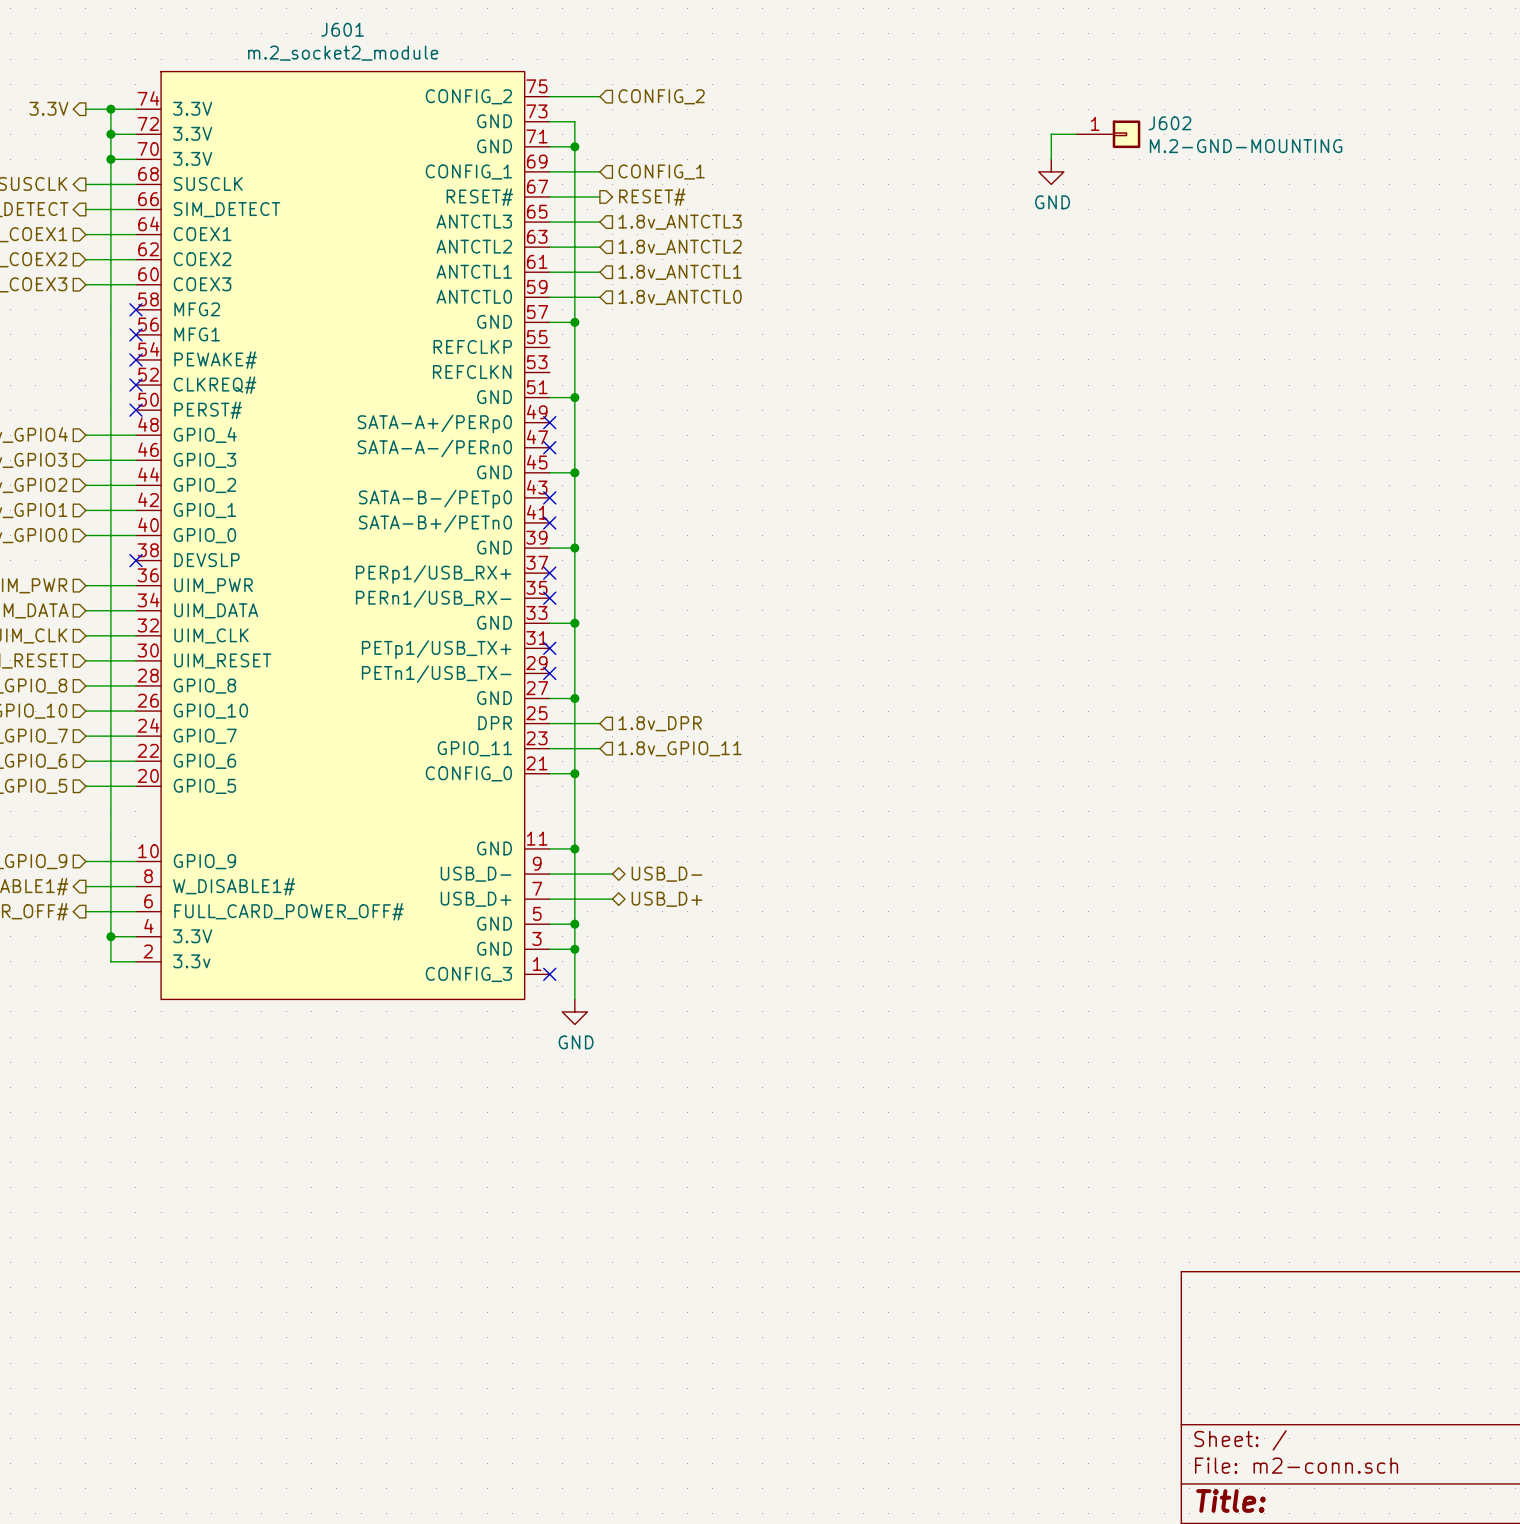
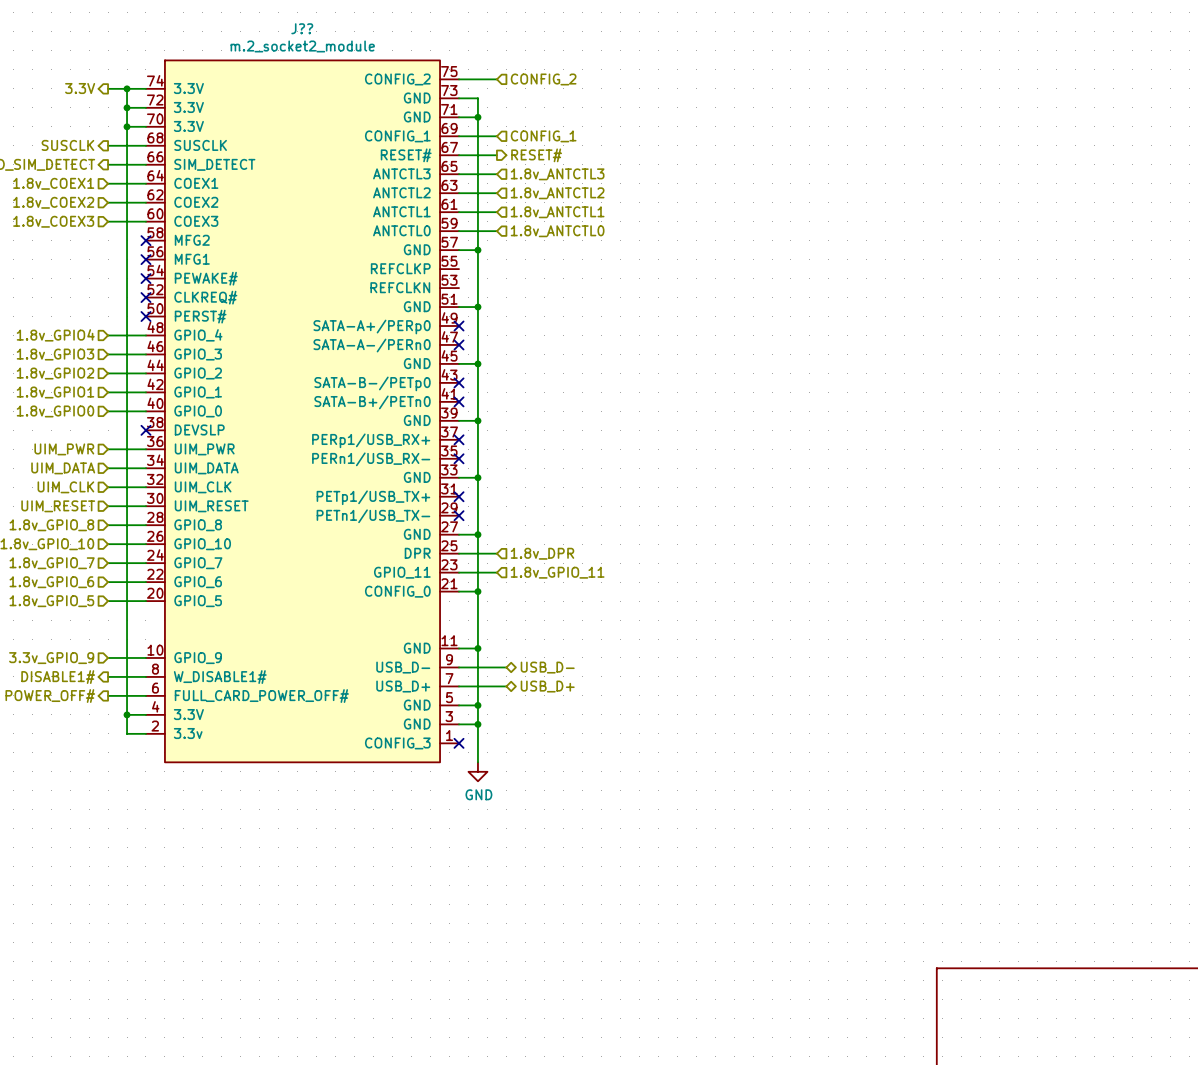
J601 name: J601 (342, 29) -> J?? (302, 28)
wire: (1076, 134) (1051, 134) (1051, 159) -> none
J602: M.2-GND-MOUNTING (1108, 134) -> none
power symbol: GND (1051, 171) -> none

